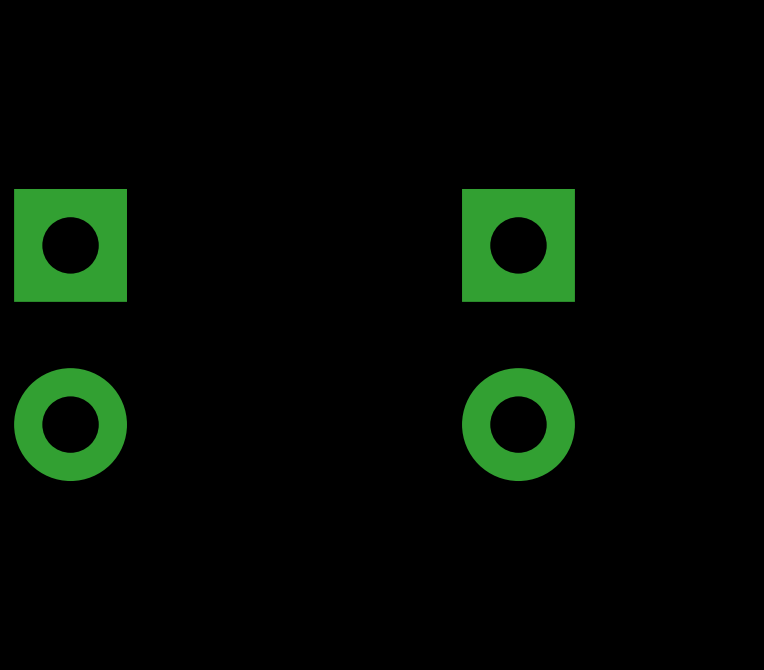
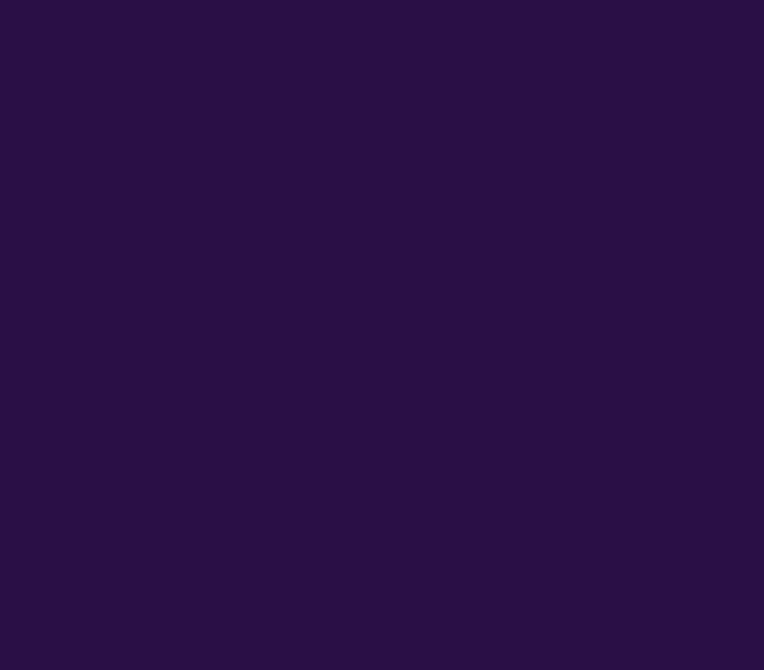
part: (70, 335) -> none
part: (518, 335) -> none

